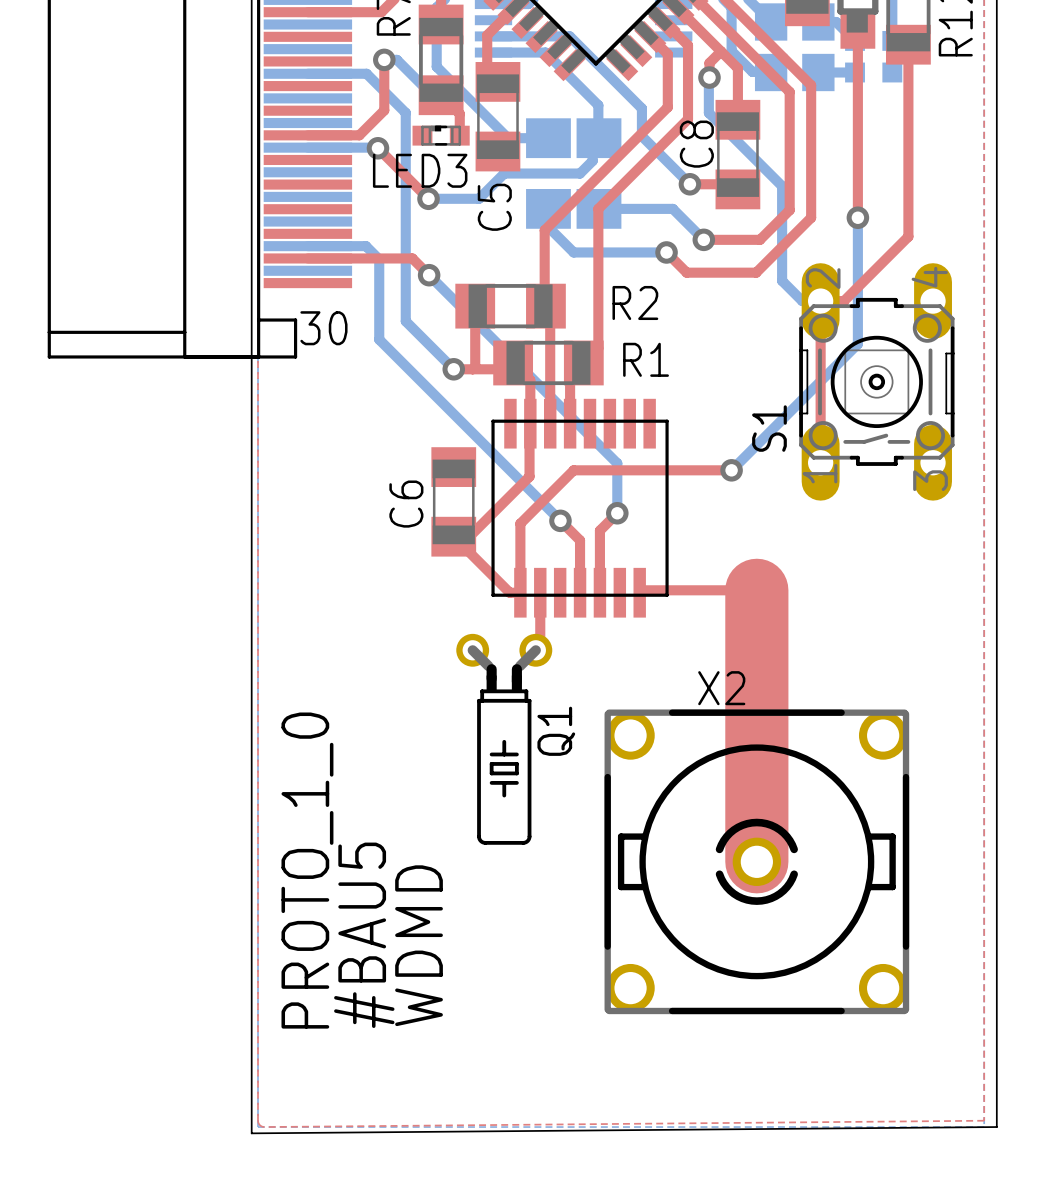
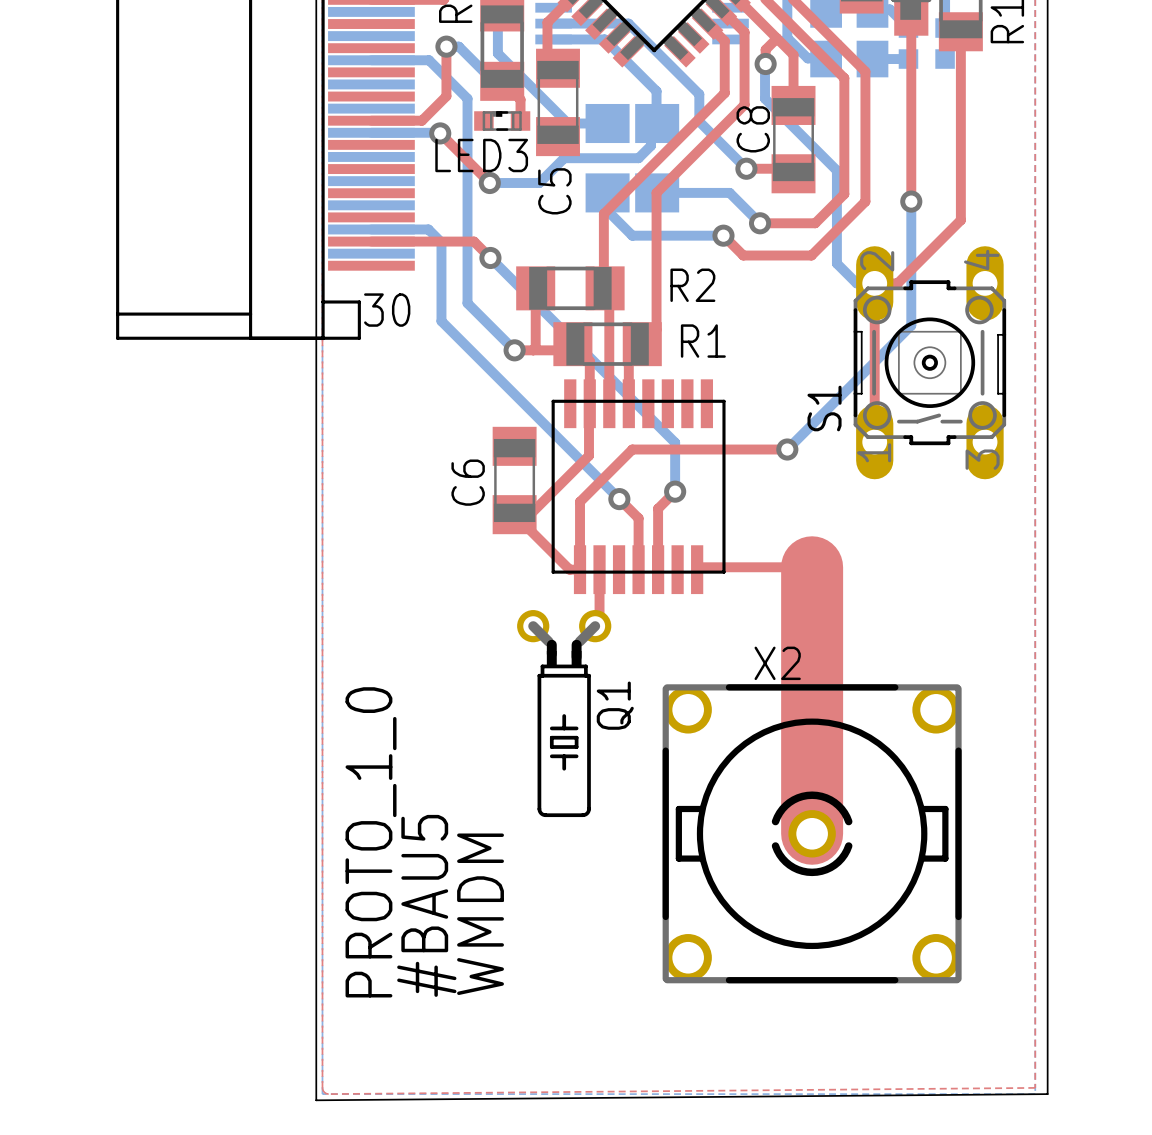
text: WDMD (419, 945) -> WMDM (480, 914)

